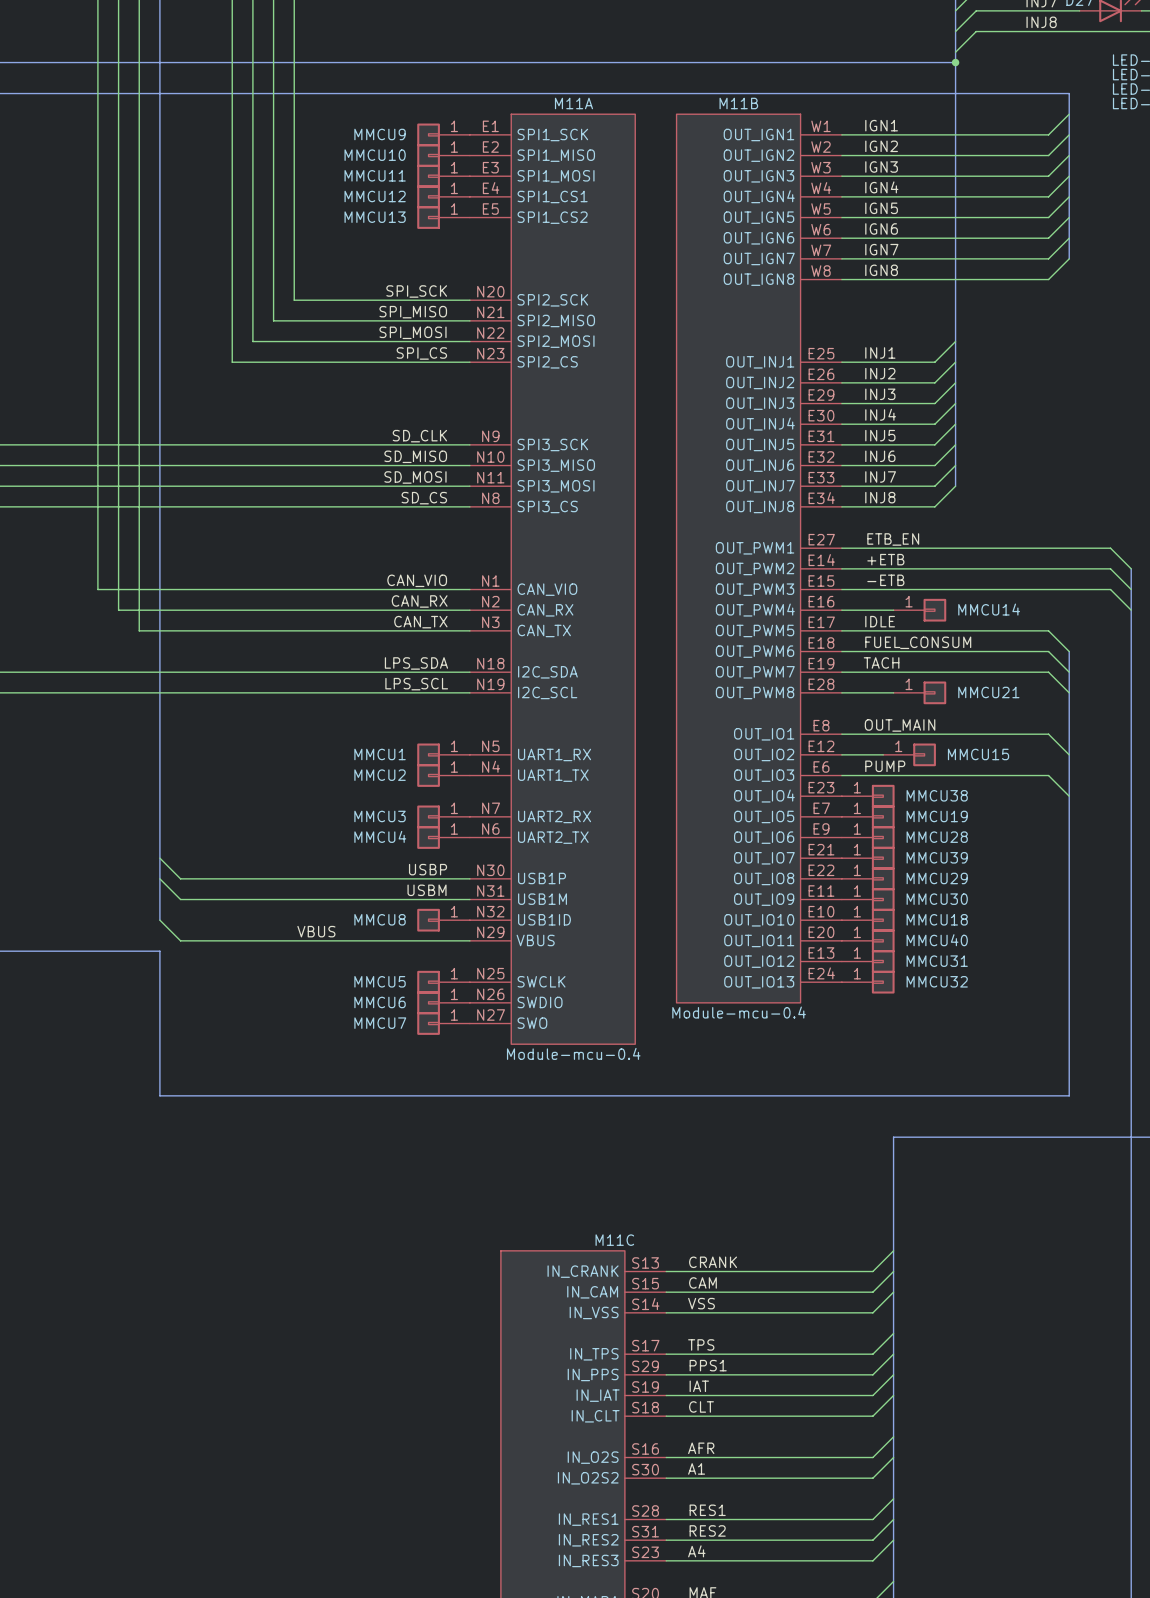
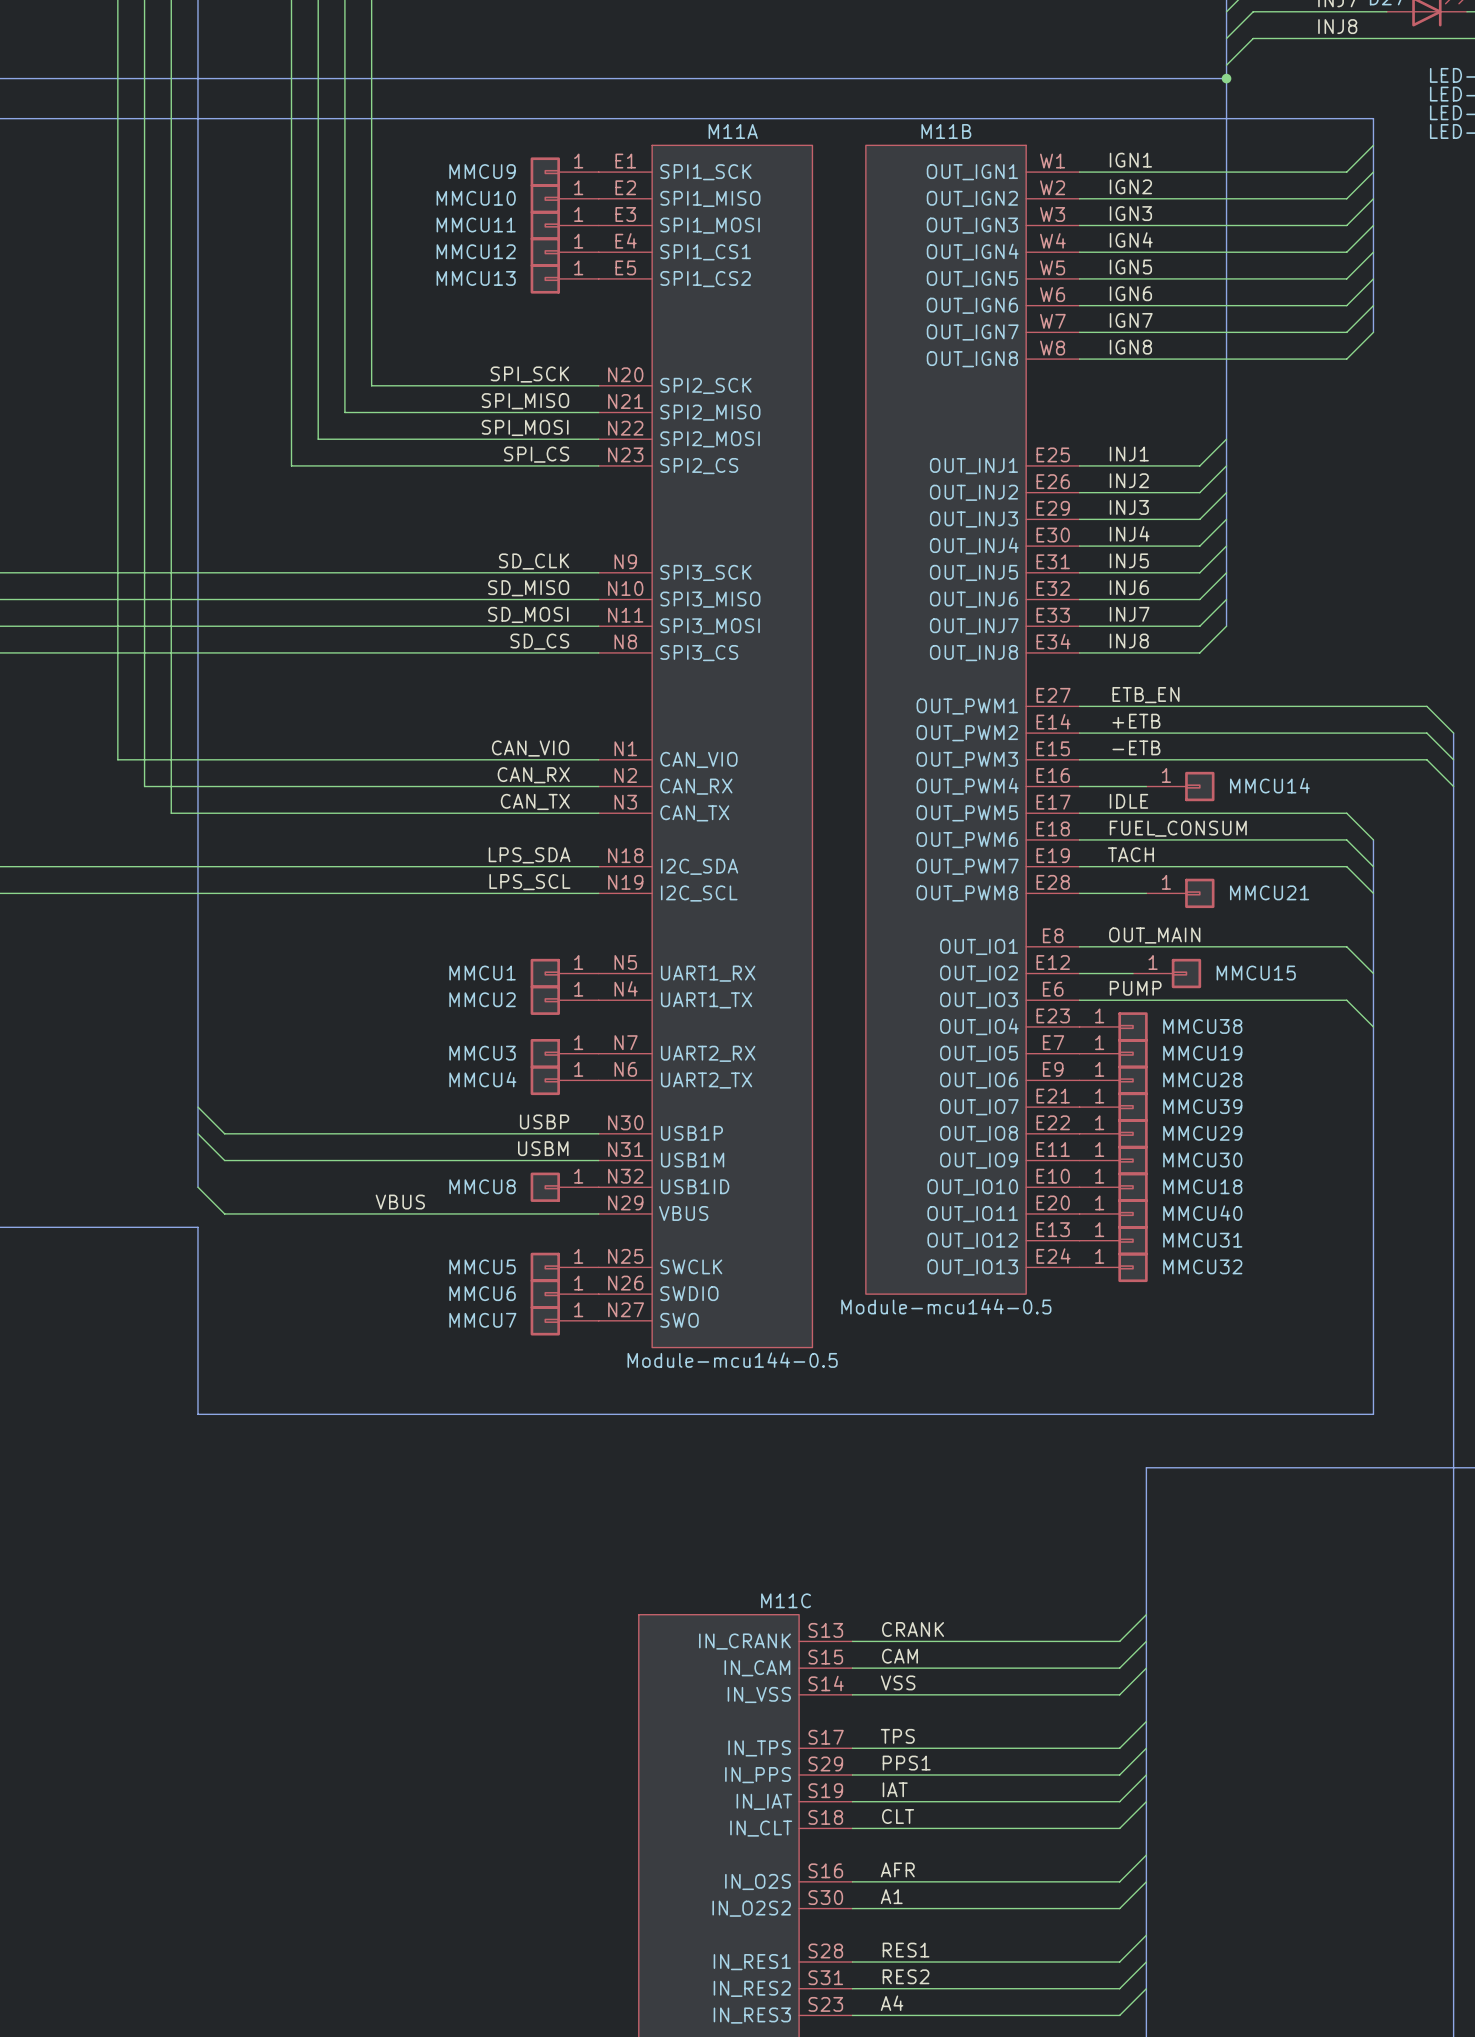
M11B value: Module-mcu-0.4 (739, 1012) -> Module-mcu144-0.5 (946, 1306)
M11A value: Module-mcu-0.4 (573, 1053) -> Module-mcu144-0.5 (732, 1360)

